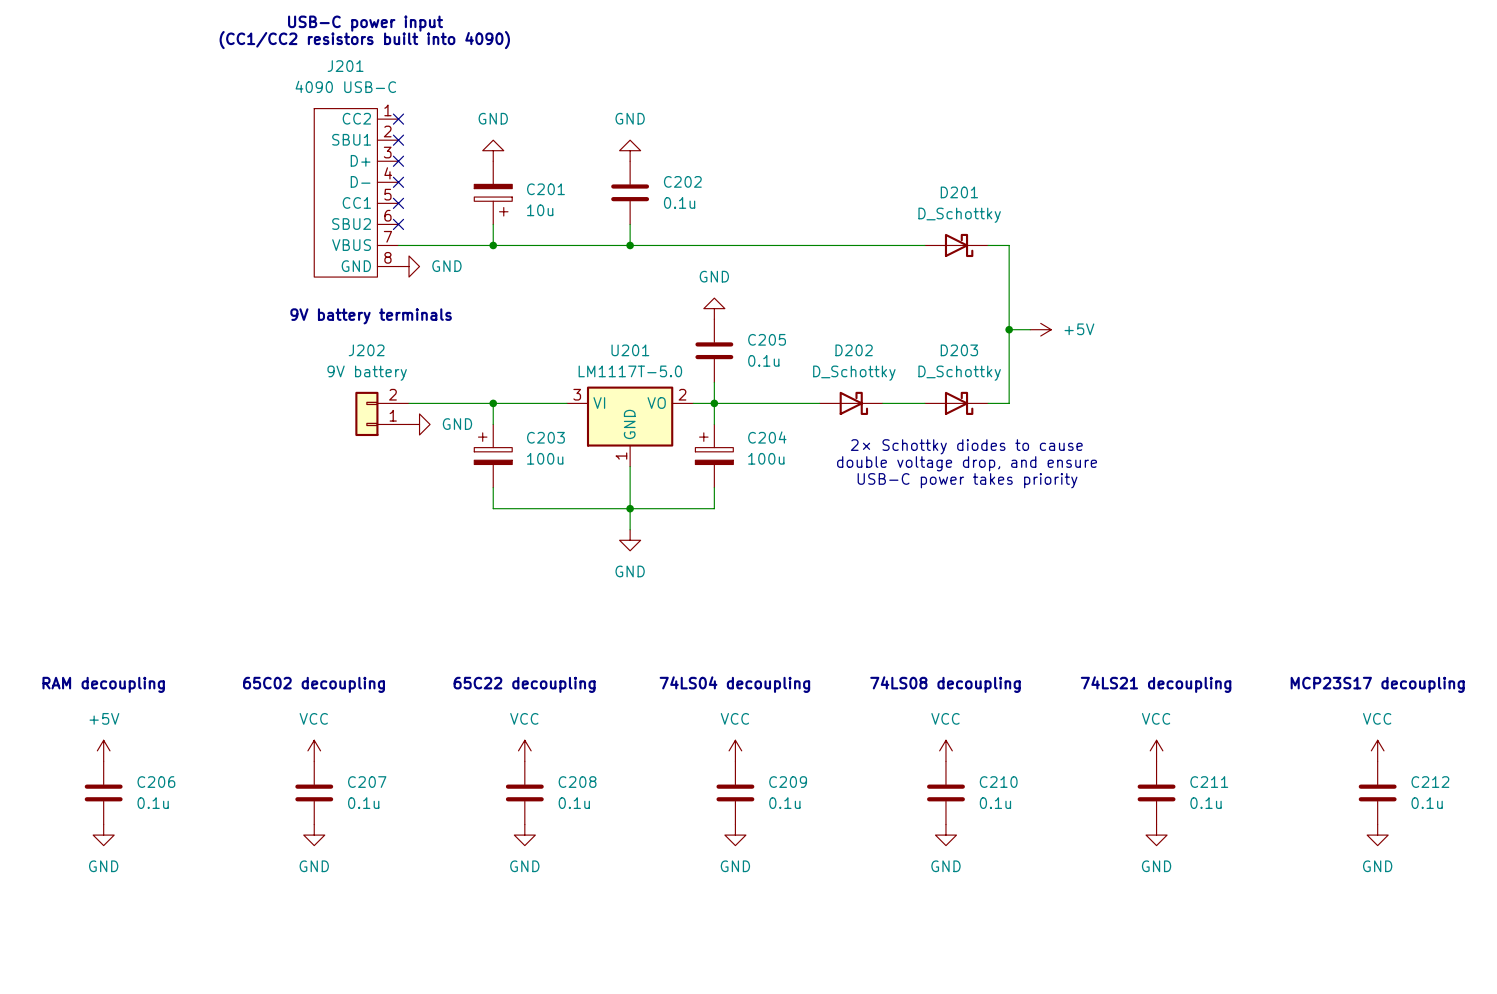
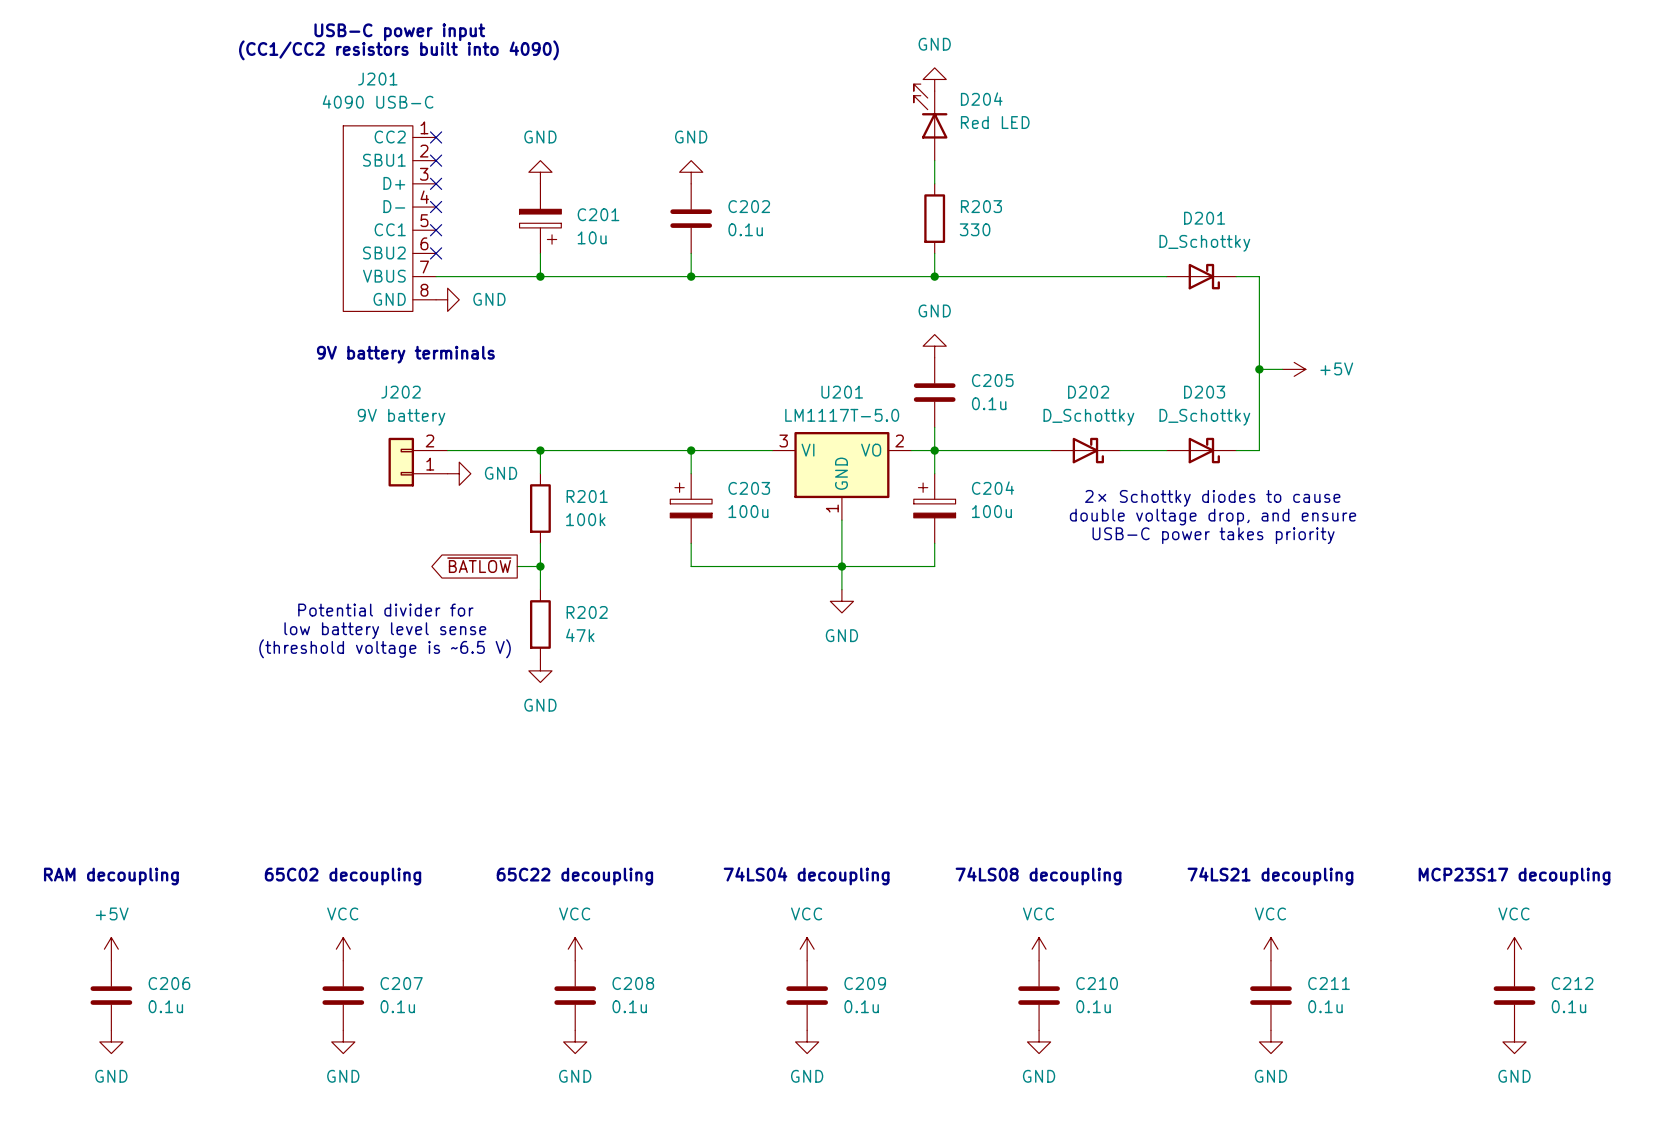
power symbol: none -> GND (934, 79)
D204: none -> Red LED (930, 122)
wire: none -> (934, 160) (934, 183)
R203: none -> 330 (934, 218)
wire: none -> (934, 253) (934, 276)
junction: none -> (934, 276)
D201 position: (956, 245) -> (1201, 276)
wire: (1009, 245) (1009, 403) (988, 403) -> (1108, 276) (1166, 276)
wire: none -> (1236, 276) (1259, 276) (1259, 450) (1236, 450)
power symbol: GND (714, 308) -> none
power symbol: none -> GND (934, 346)
wire: (1009, 329) (1030, 329) -> (1259, 369) (1282, 369)
junction: (1009, 329) -> none
power symbol position: +5V (1040, 329) -> +5V (1294, 369)
junction: none -> (1259, 369)
C205 position: (714, 350) -> (934, 392)
wire: (714, 382) (714, 424) -> (934, 427) (934, 473)
junction: none -> (691, 450)
junction: (714, 403) -> none
junction: none -> (934, 450)
D202 position: (851, 403) -> (1085, 450)
D203 position: (956, 403) -> (1201, 450)
wire: none -> (1120, 450) (1166, 450)
U201 position: (630, 426) -> (841, 476)
text position: 2× Schottky diodes to cause (966, 446) -> 2× Schottky diodes to cause (1212, 498)
C203 position: (493, 456) -> (691, 508)
R201: none -> 100k (540, 508)
C204 position: (714, 456) -> (934, 508)
text position: double voltage drop, and ensure (967, 463) -> double voltage drop, and ensure (1213, 517)
wire: none -> (841, 520) (841, 589)
text position: USB-C power takes priority (967, 480) -> USB-C power takes priority (1213, 535)
wire: (714, 487) (714, 508) -> (934, 543) (934, 566) (783, 566)
global label: none -> ~{BATLOW} (479, 565)
wire: none -> (517, 566) (540, 566) (540, 589)
wire: (493, 508) (630, 508) (630, 529) -> none
junction: none -> (540, 566)
junction: (630, 508) -> none
junction: none -> (841, 566)
power symbol: GND (630, 540) -> none
power symbol: none -> GND (841, 601)
text: none -> Potential divider for (385, 610)
R202: none -> 47k (540, 624)
text: none -> low battery level sense (385, 630)
text: none -> (threshold voltage is ~6.5 V) (385, 648)
power symbol: none -> GND (540, 670)
text position: RAM decoupling (103, 684) -> RAM decoupling (111, 876)
text position: 65C02 decoupling (314, 684) -> 65C02 decoupling (343, 876)
text position: 65C22 decoupling (524, 684) -> 65C22 decoupling (574, 876)
text position: 74LS04 decoupling (734, 684) -> 74LS04 decoupling (806, 876)
text position: 74LS08 decoupling (945, 684) -> 74LS08 decoupling (1038, 876)
text position: 74LS21 decoupling (1156, 684) -> 74LS21 decoupling (1270, 876)
text position: MCP23S17 decoupling (1377, 684) -> MCP23S17 decoupling (1514, 876)
power symbol position: +5V (103, 750) -> +5V (111, 949)
power symbol position: VCC (314, 750) -> VCC (343, 949)
power symbol position: VCC (524, 750) -> VCC (575, 949)
power symbol position: VCC (735, 750) -> VCC (807, 949)
power symbol position: VCC (945, 750) -> VCC (1039, 949)
power symbol position: VCC (1156, 750) -> VCC (1270, 949)
power symbol position: VCC (1377, 750) -> VCC (1514, 949)
C206 position: (103, 792) -> (111, 995)
C207 position: (314, 792) -> (343, 995)
C208 position: (524, 792) -> (575, 995)
C209 position: (735, 792) -> (807, 995)
C210 position: (945, 792) -> (1039, 995)
C211 position: (1156, 792) -> (1270, 995)
C212 position: (1377, 792) -> (1514, 995)
power symbol position: GND (103, 835) -> GND (111, 1041)
power symbol position: GND (314, 835) -> GND (343, 1041)
power symbol position: GND (524, 835) -> GND (575, 1041)
power symbol position: GND (735, 835) -> GND (807, 1041)
power symbol position: GND (945, 835) -> GND (1039, 1041)
power symbol position: GND (1156, 835) -> GND (1270, 1041)
power symbol position: GND (1377, 835) -> GND (1514, 1041)

